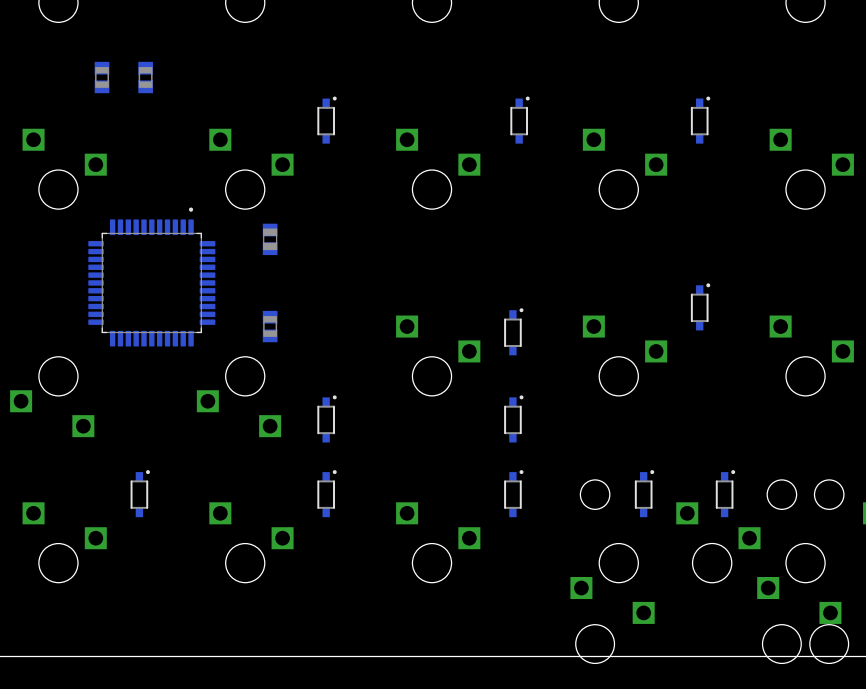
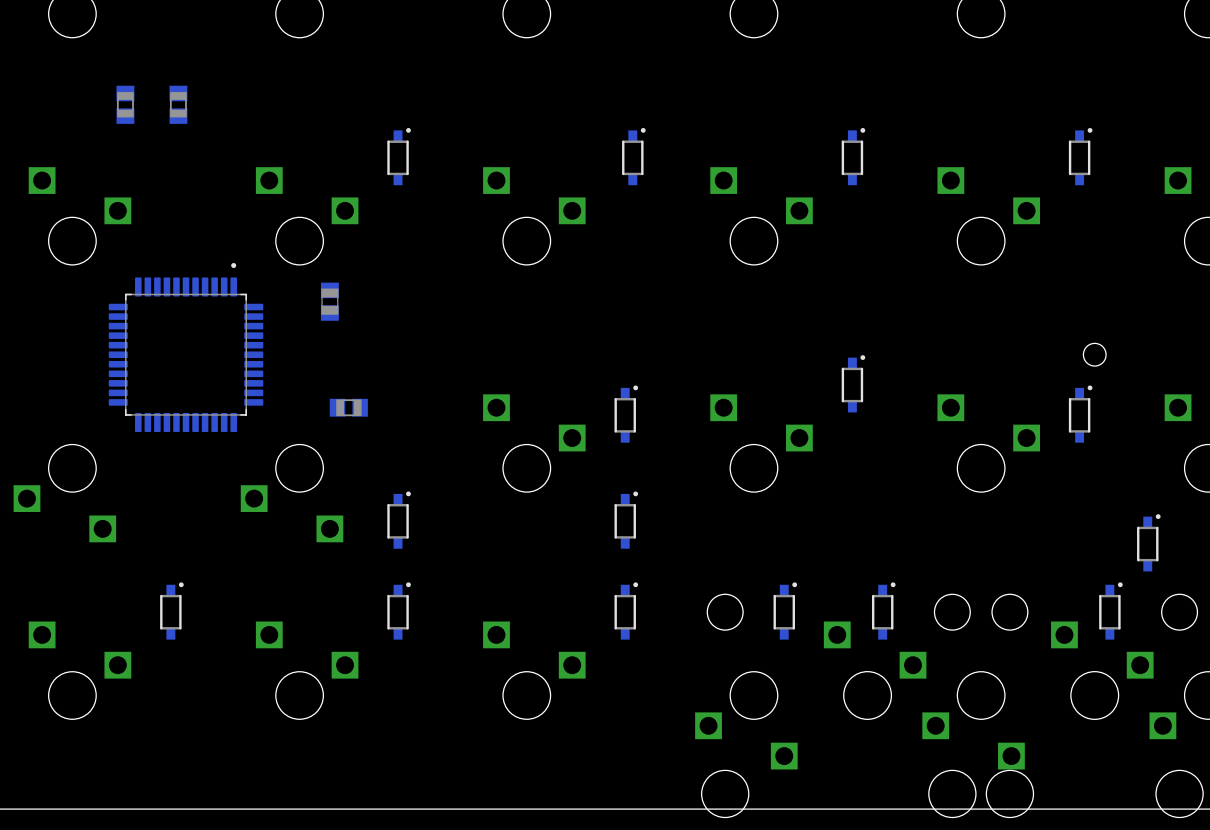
part rotation: 0° (270, 326) -> 90° clockwise (348, 407)

